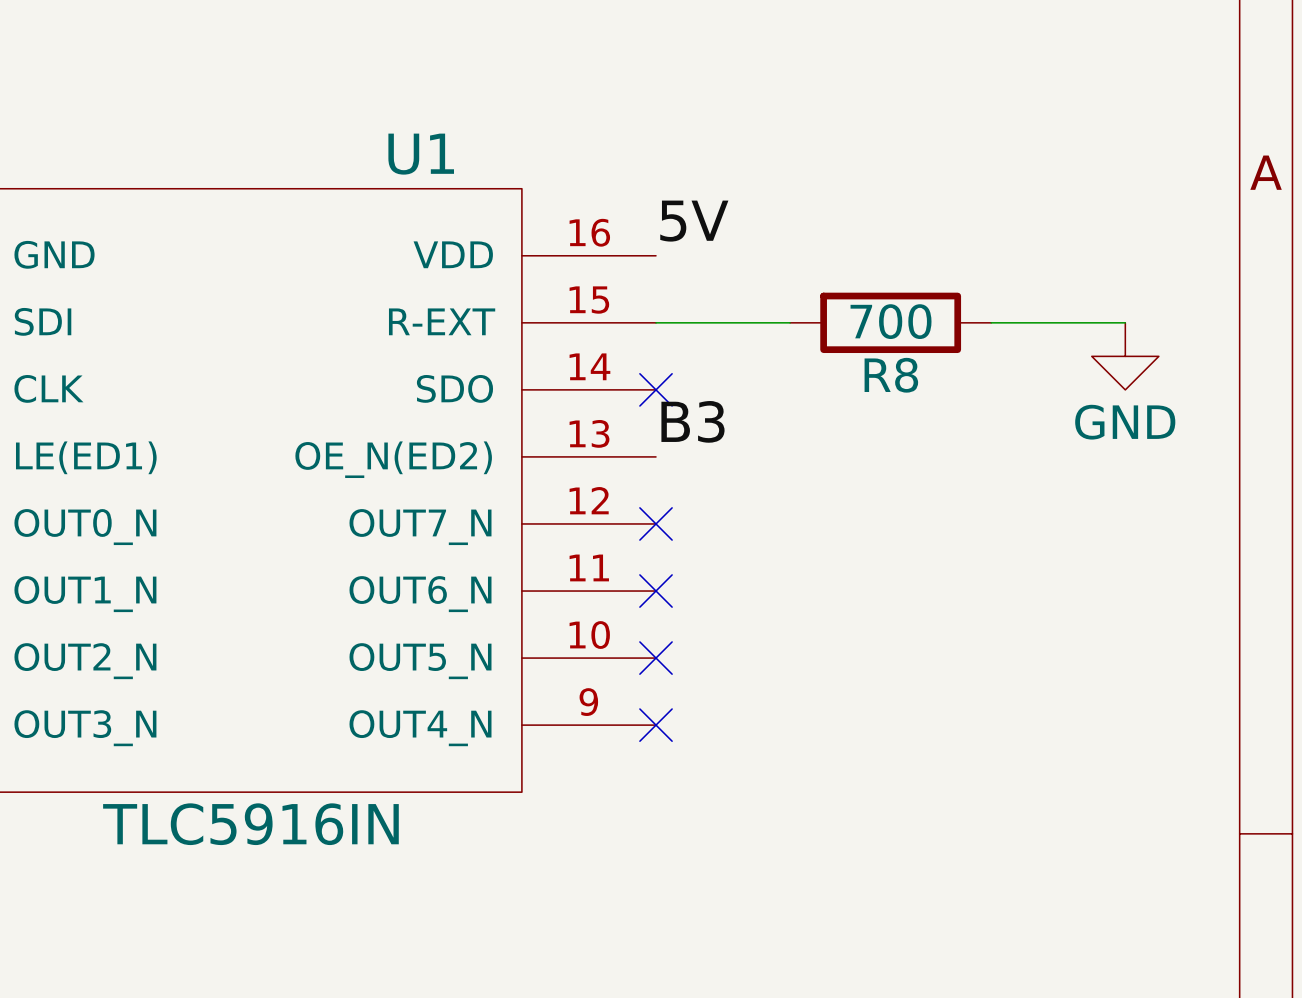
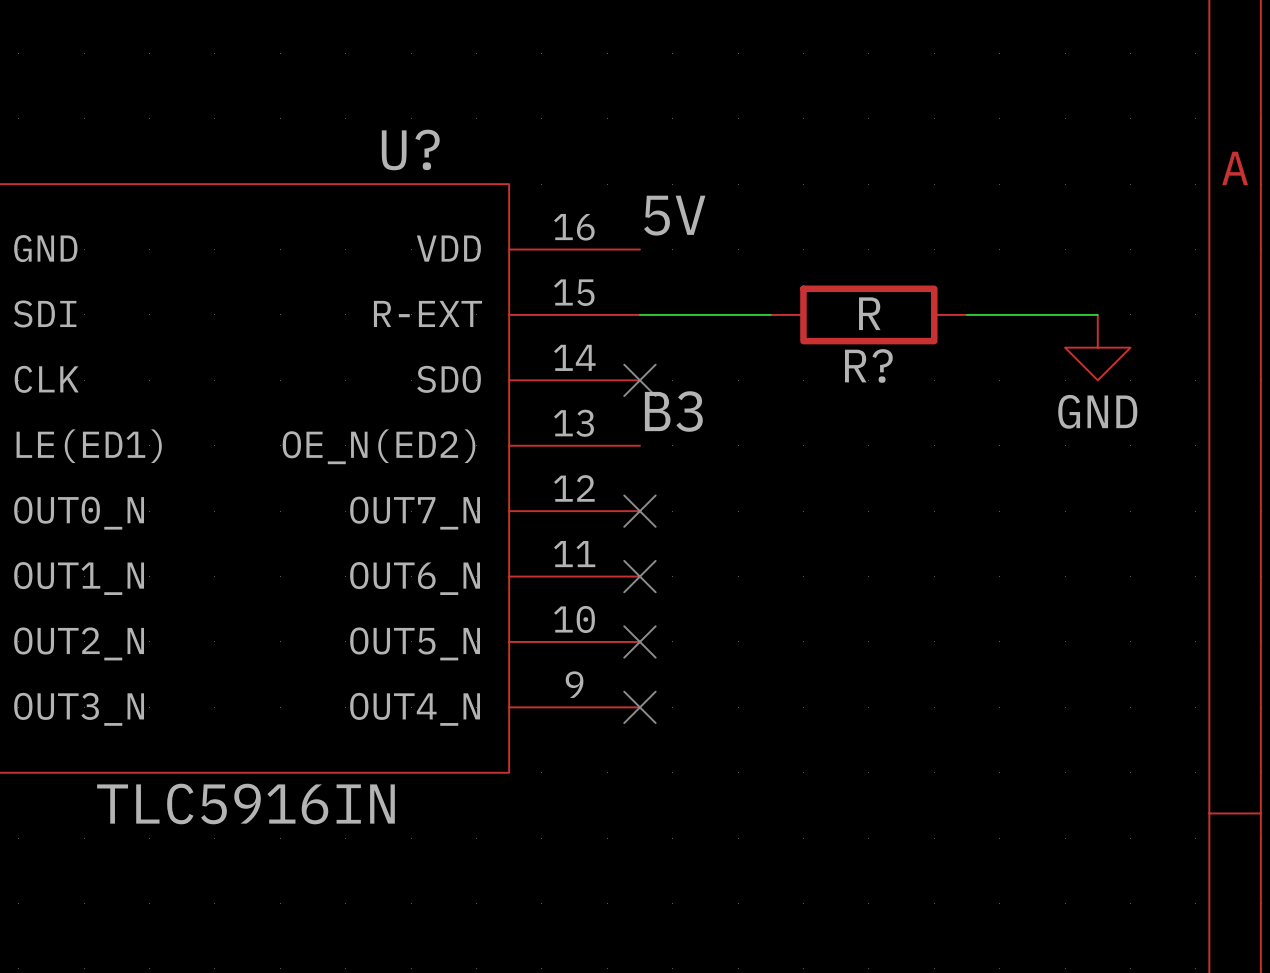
U1 name: U1 (421, 154) -> U? (410, 149)
R8 value: 700 (891, 321) -> R (869, 313)
R8 name: R8 (891, 375) -> R? (868, 365)

